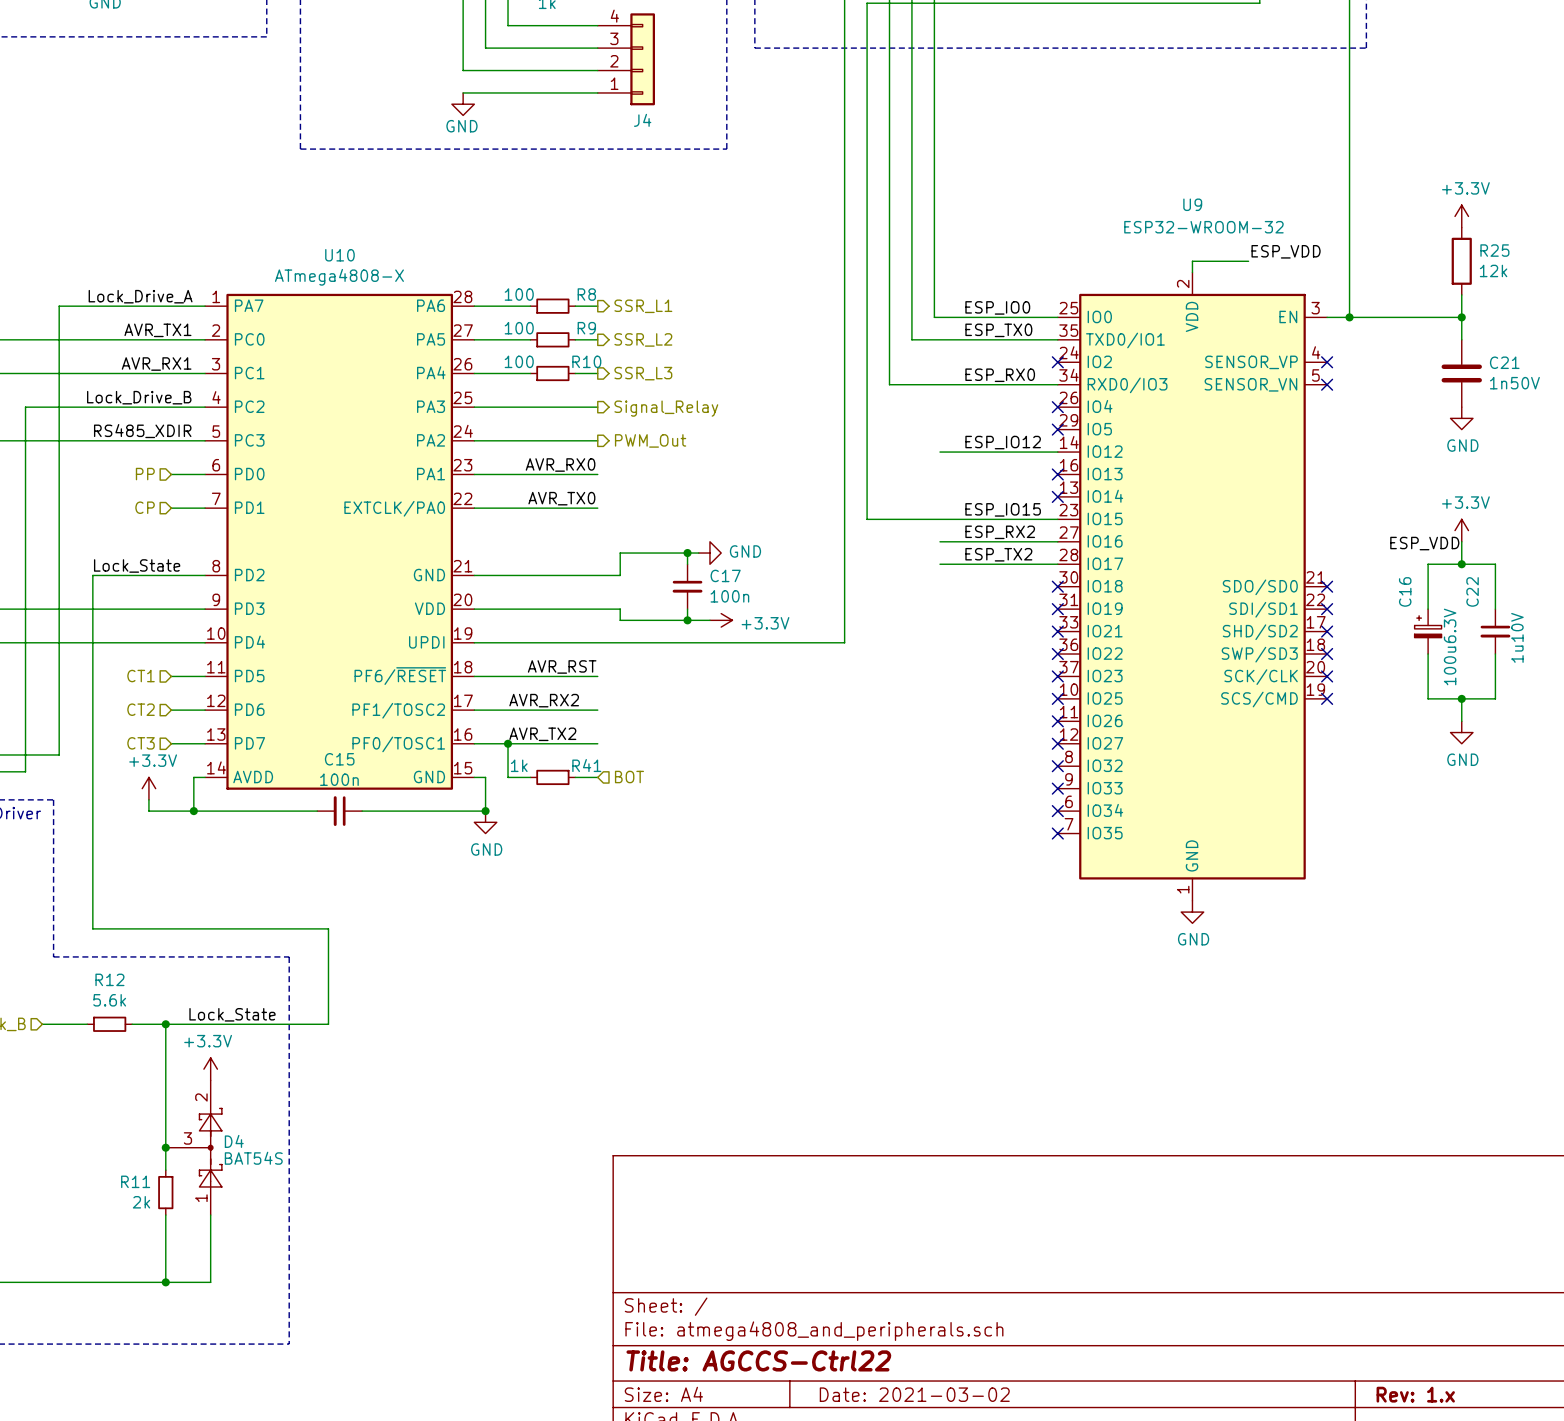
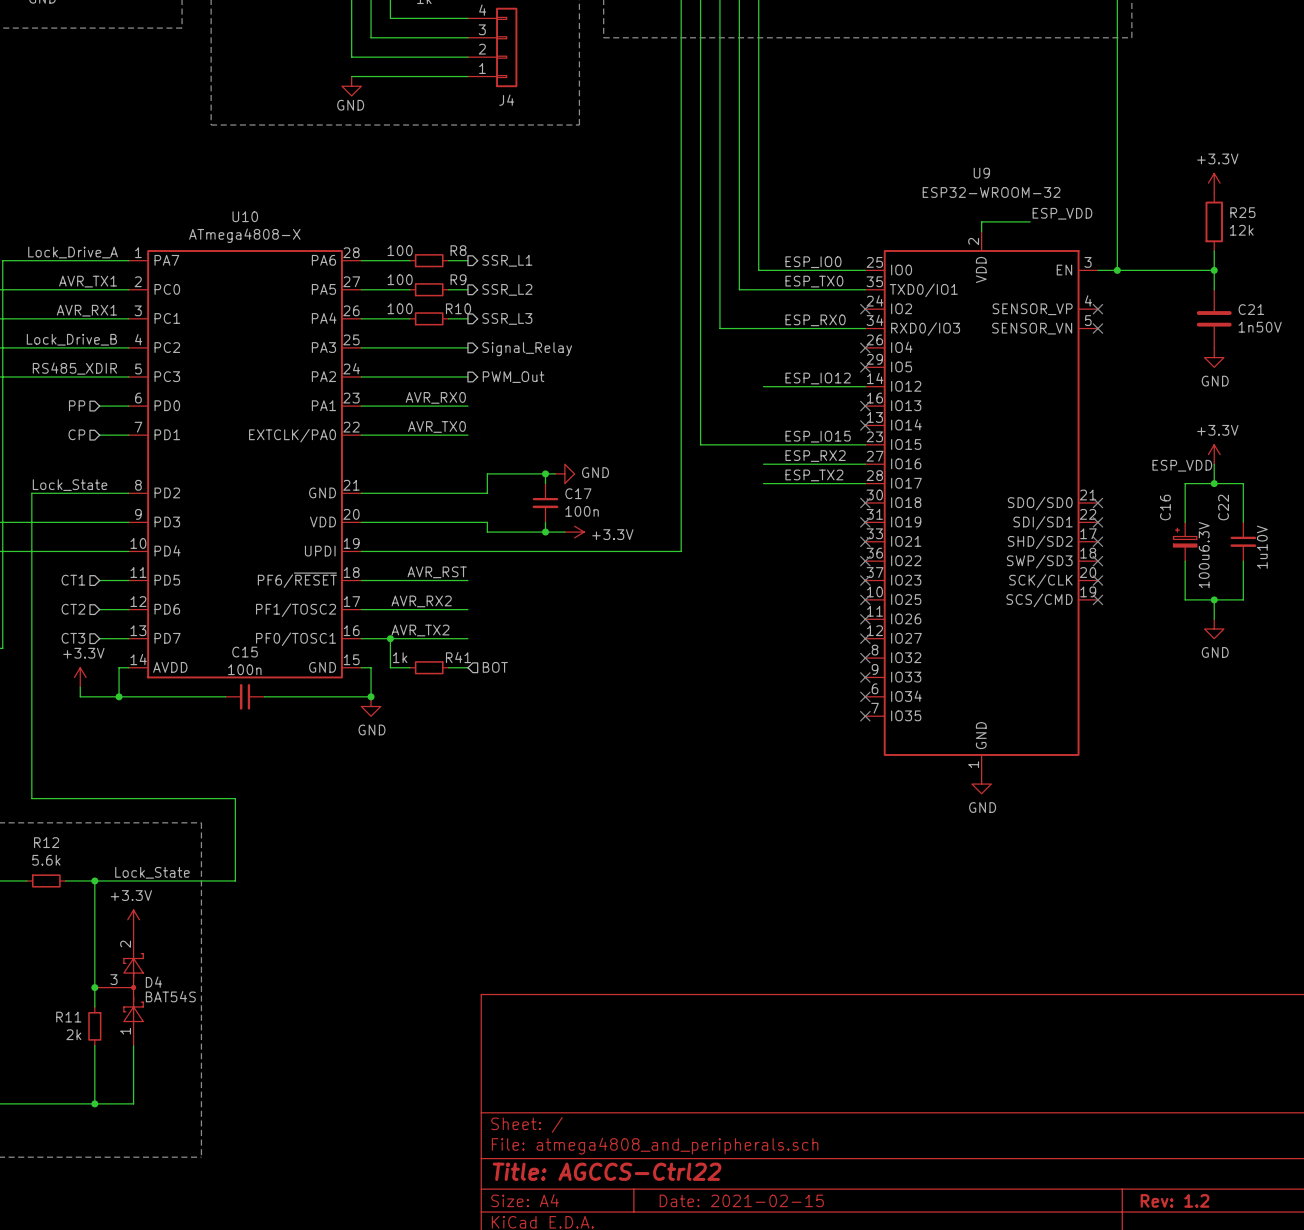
title block: Date: 2021-03-02 (914, 1394) -> Date: 2021-02-15 (741, 1200)
title block: Rev: 1.x (1415, 1394) -> Rev: 1.2 (1175, 1200)

